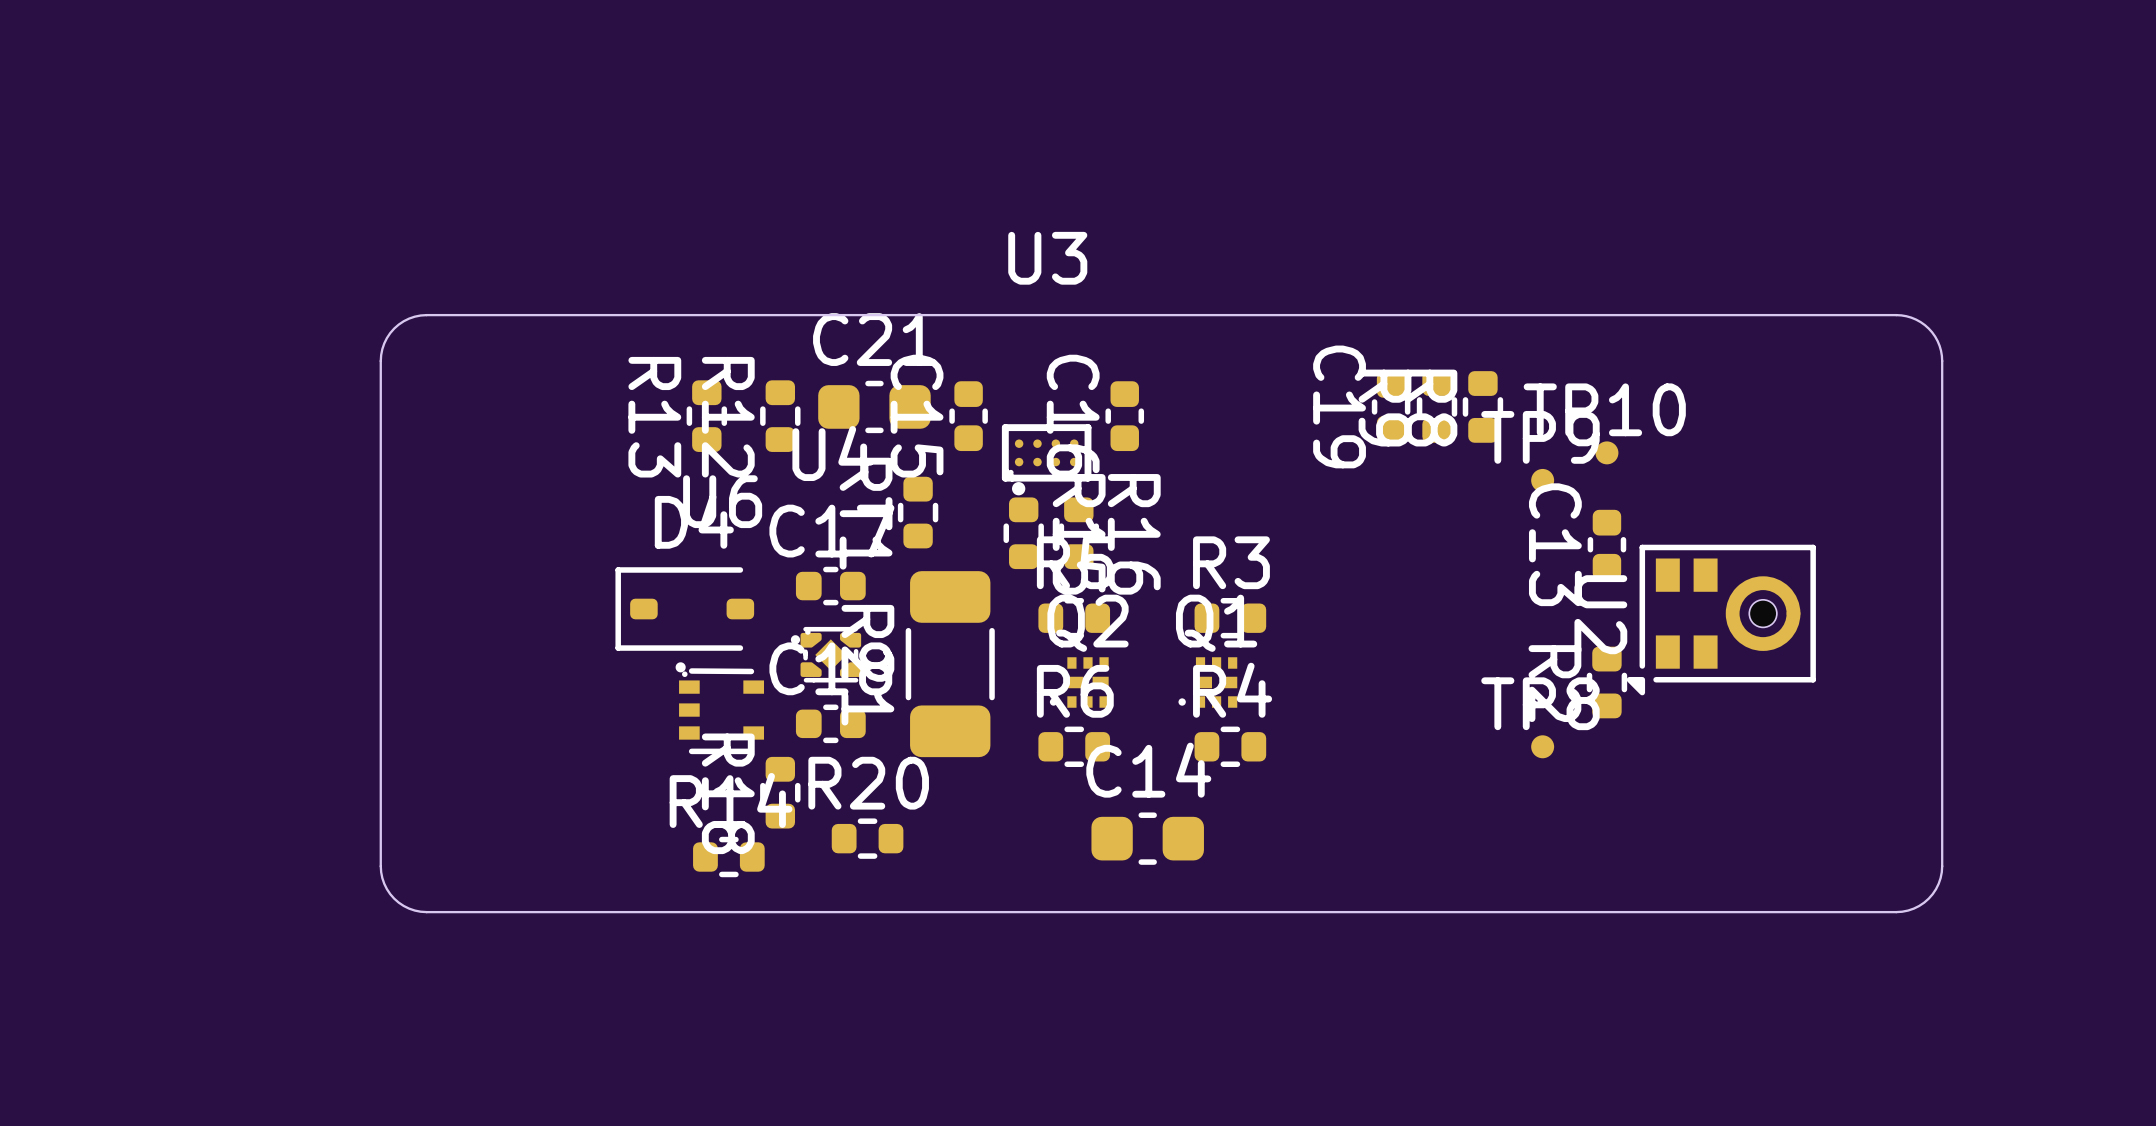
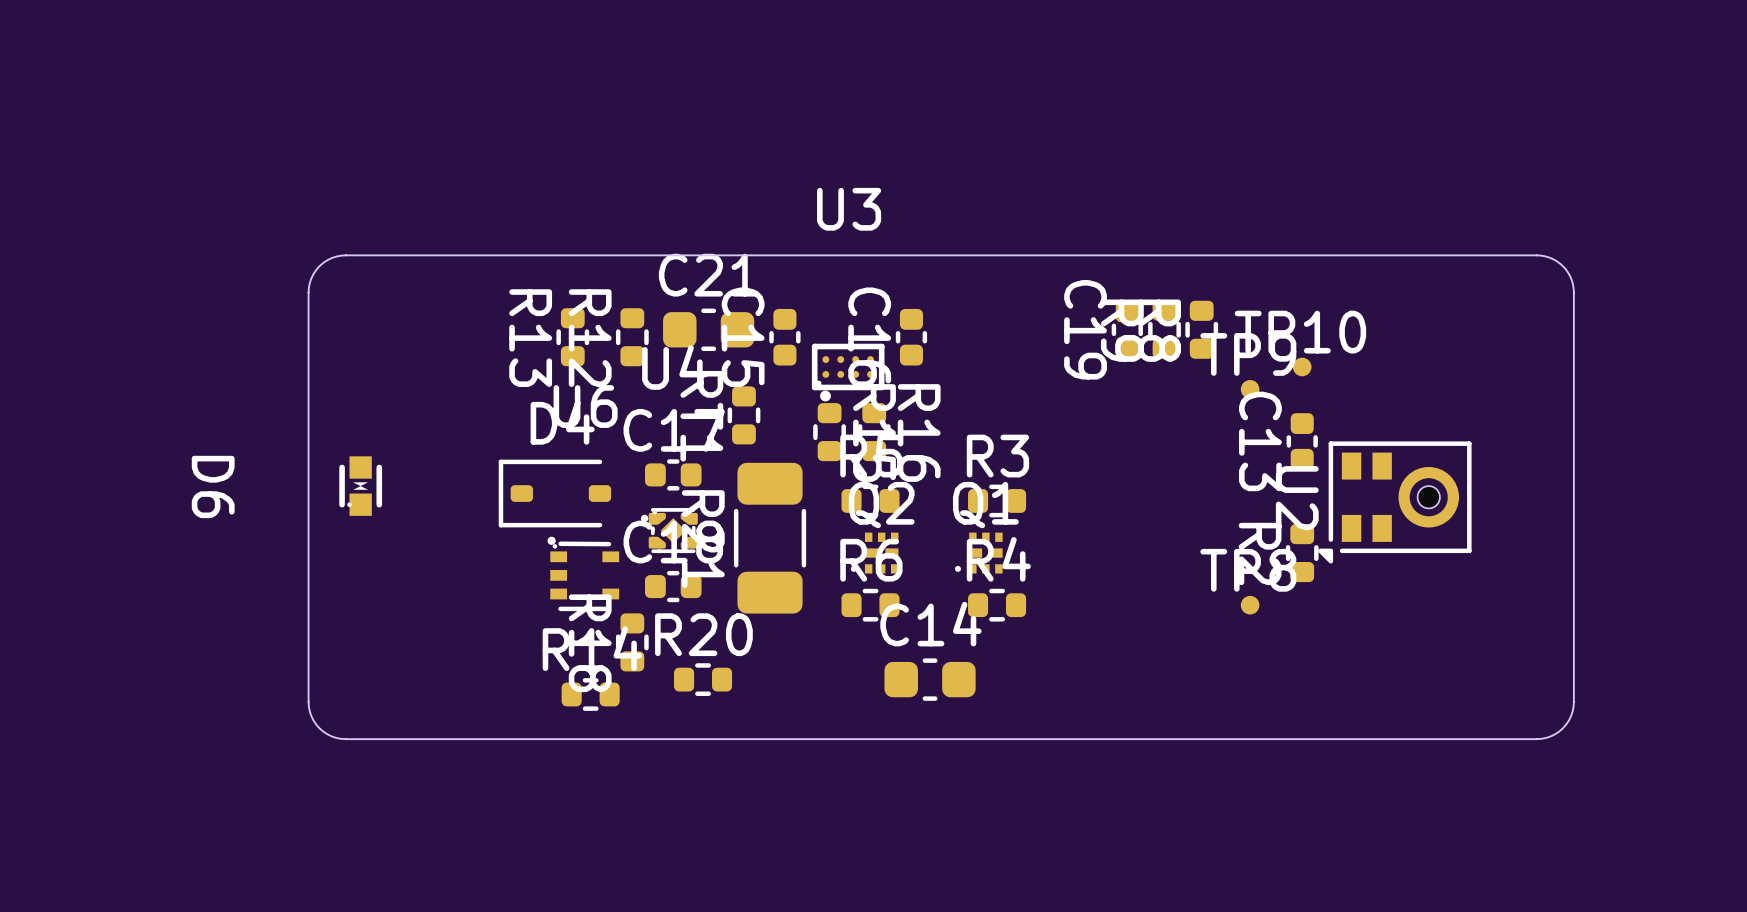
D6: none -> (360, 486)

